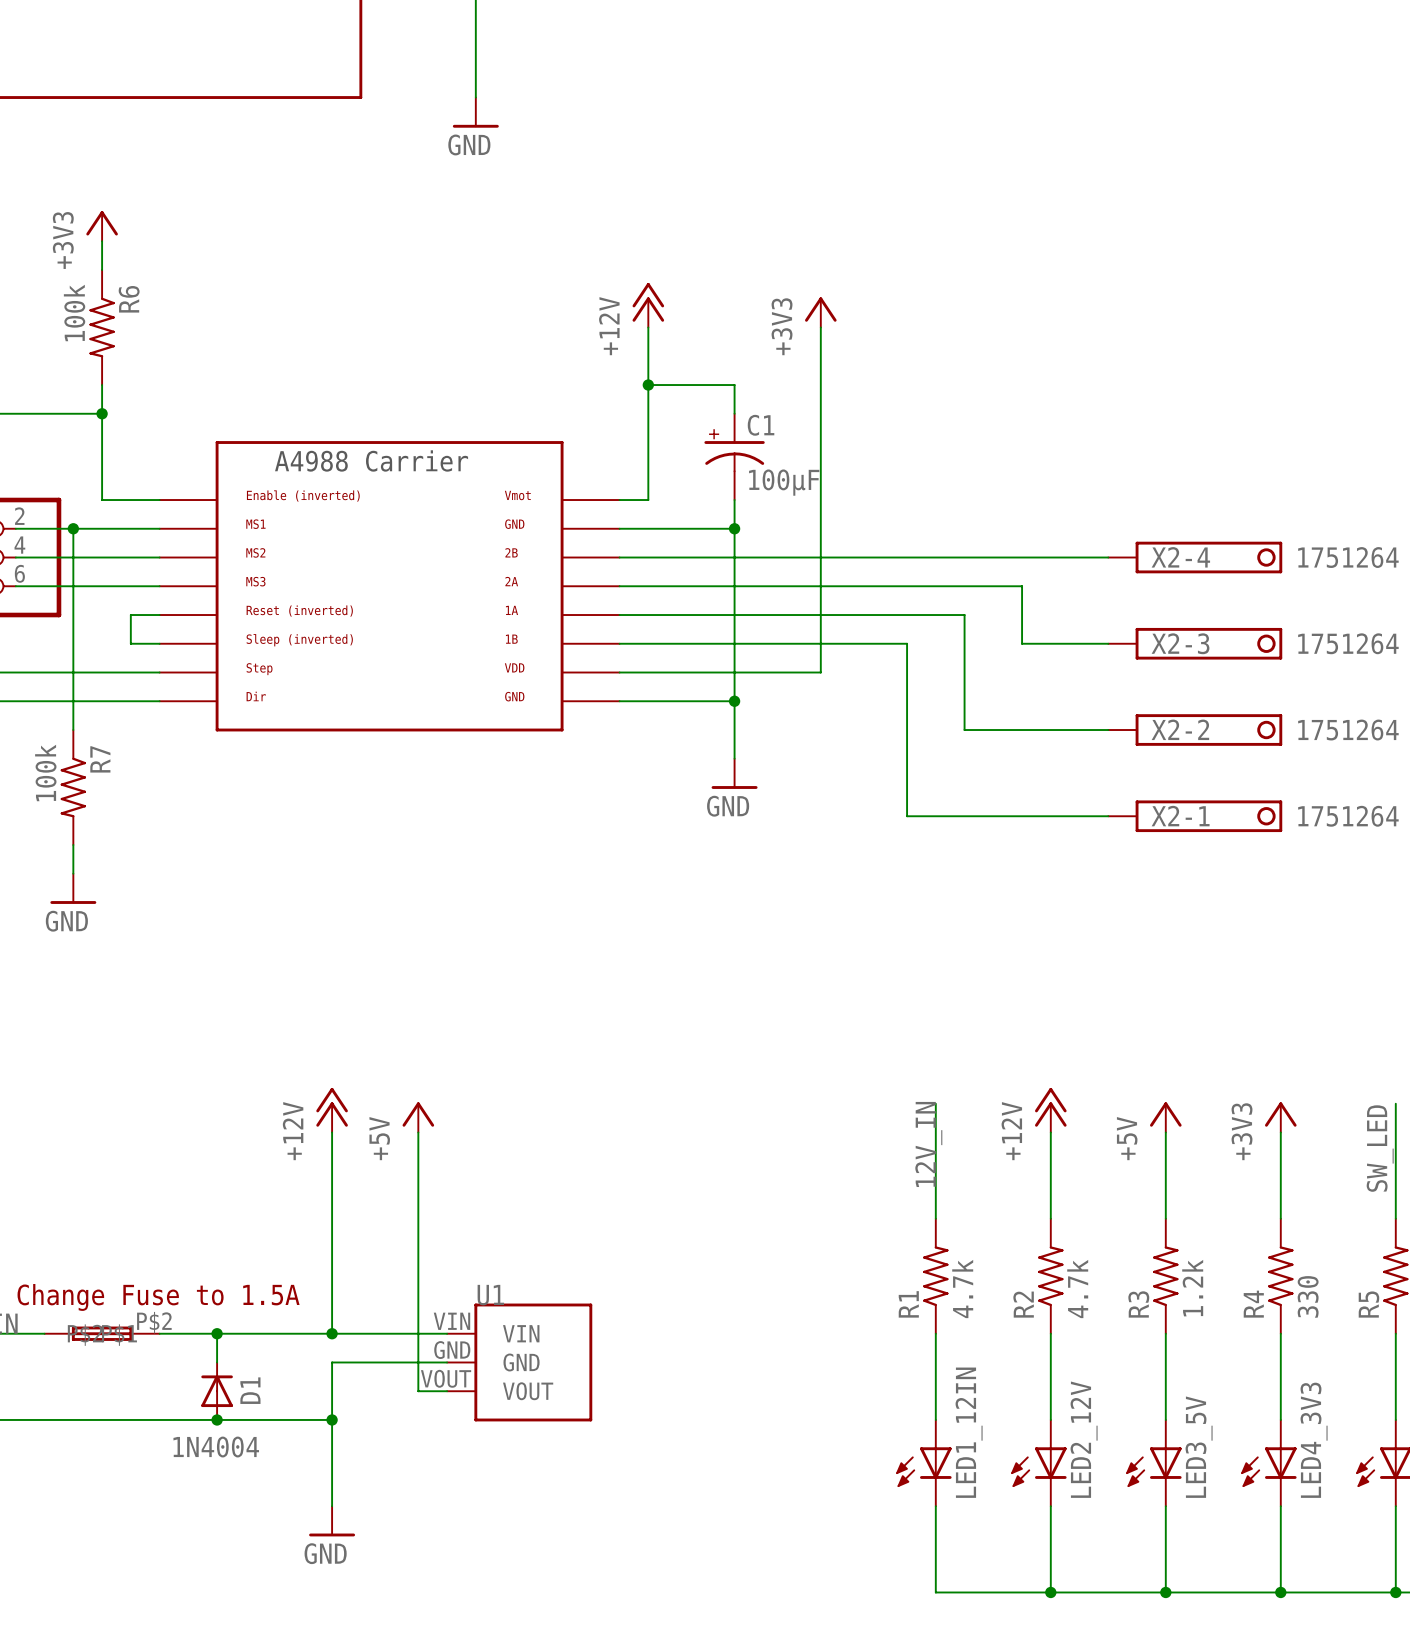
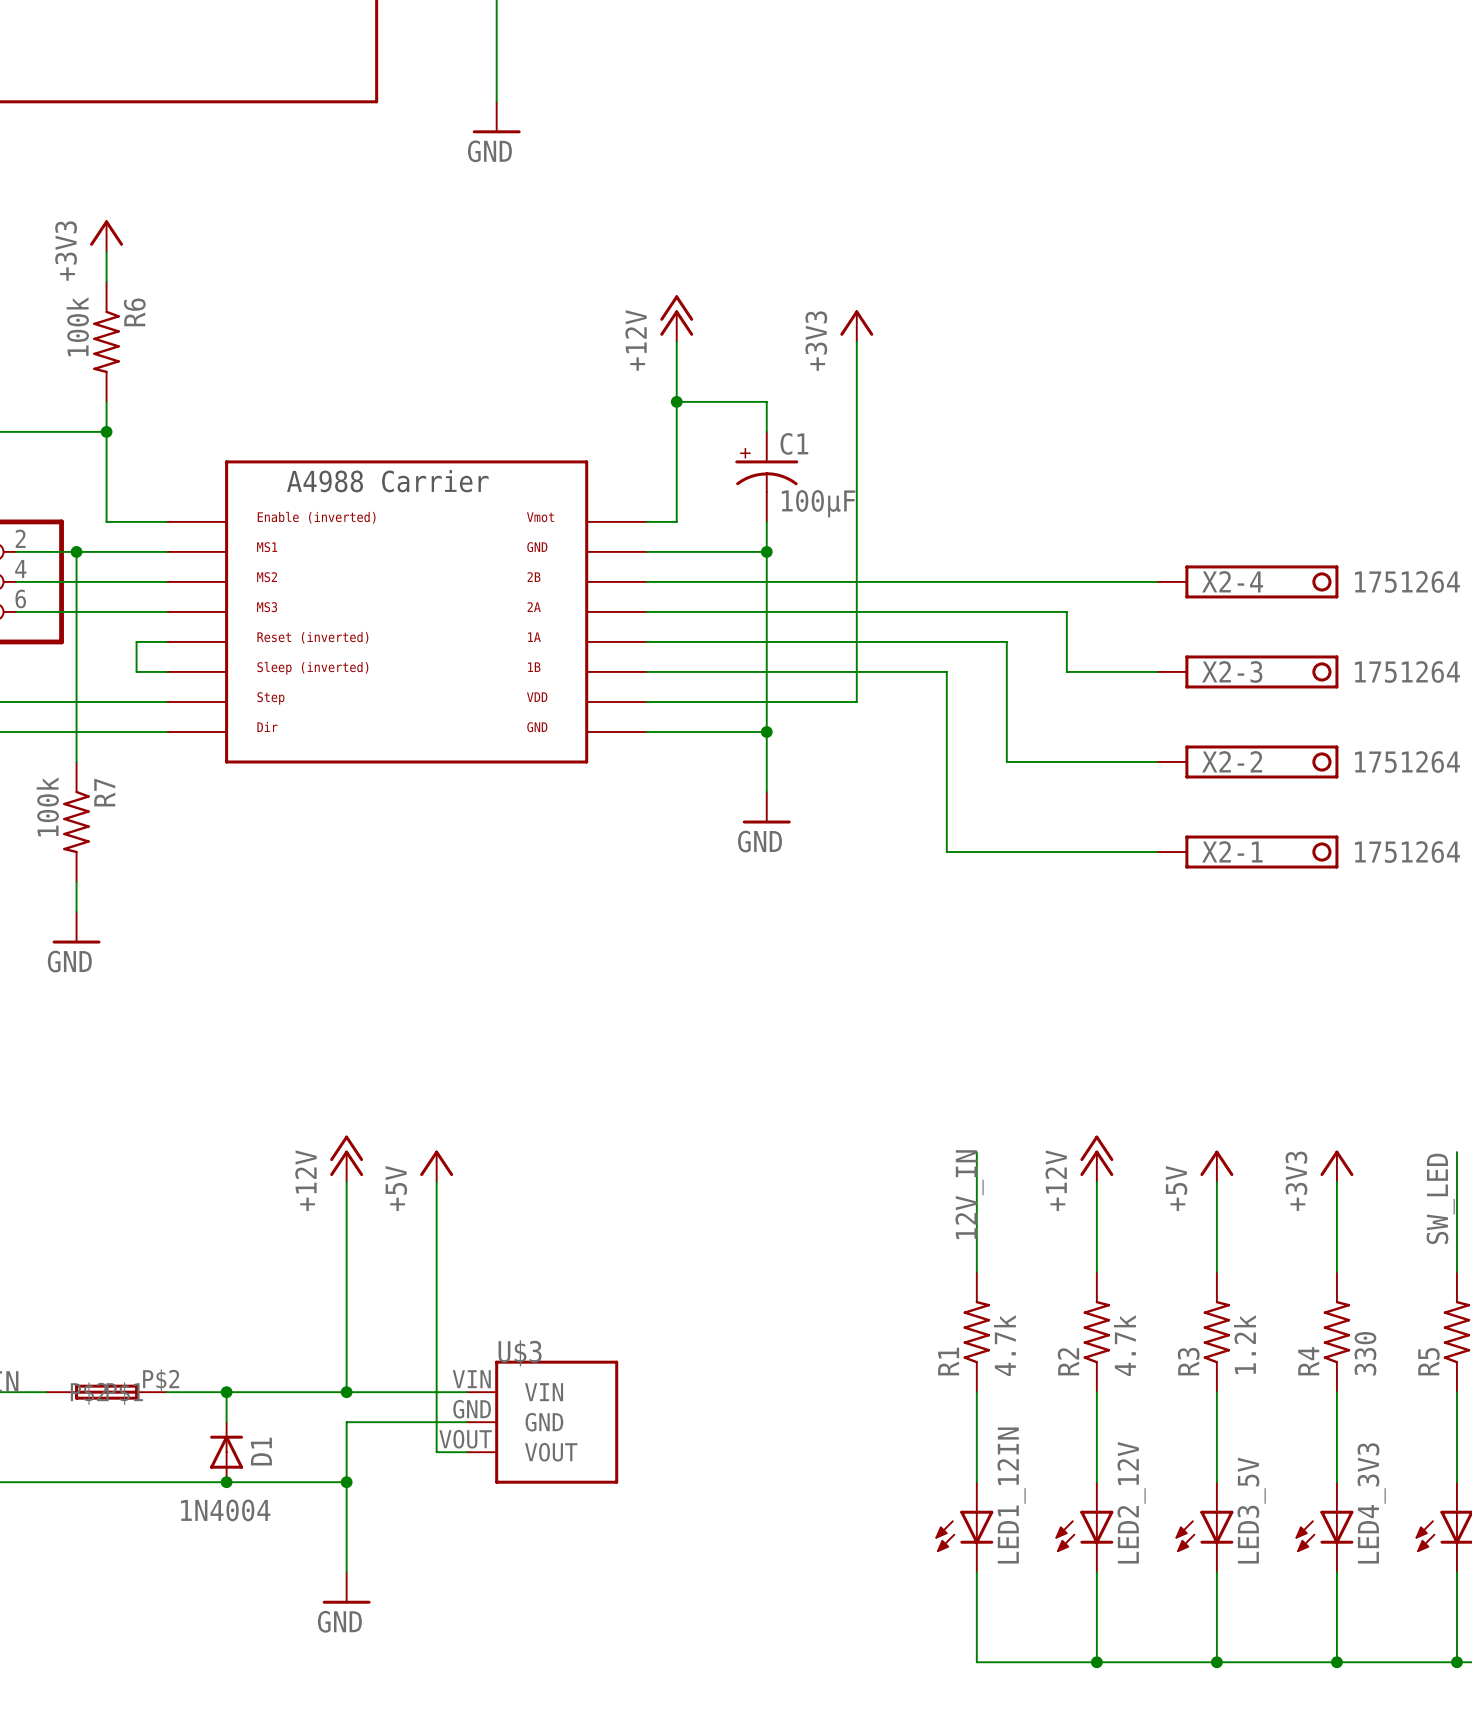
U1 name: U1 (490, 1295) -> U$3 (520, 1353)
text: Change Fuse to 1.5A (158, 1297) -> none

